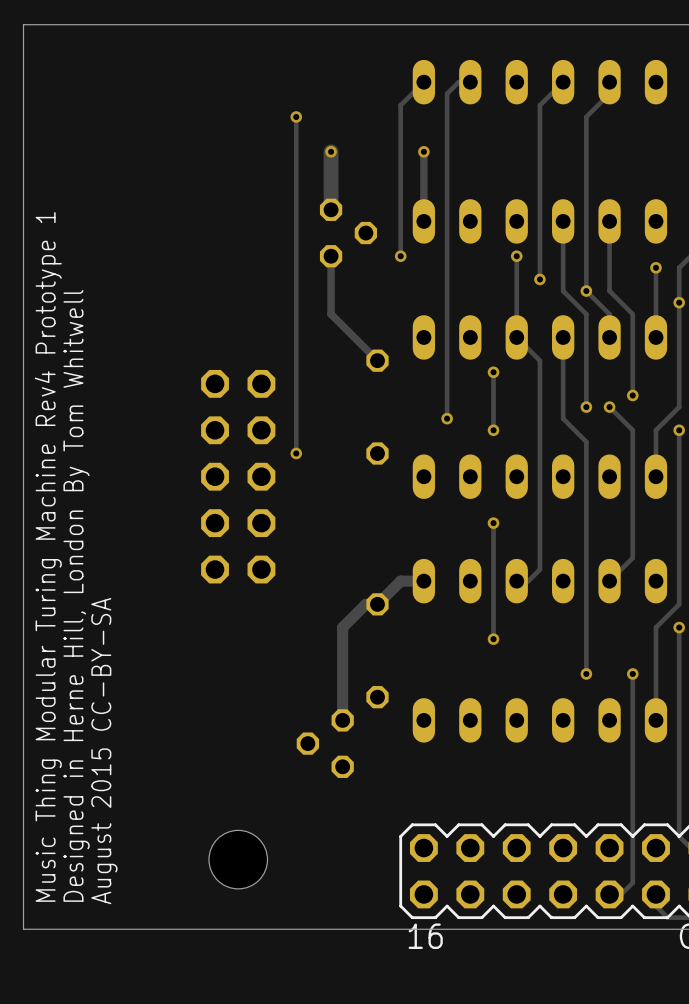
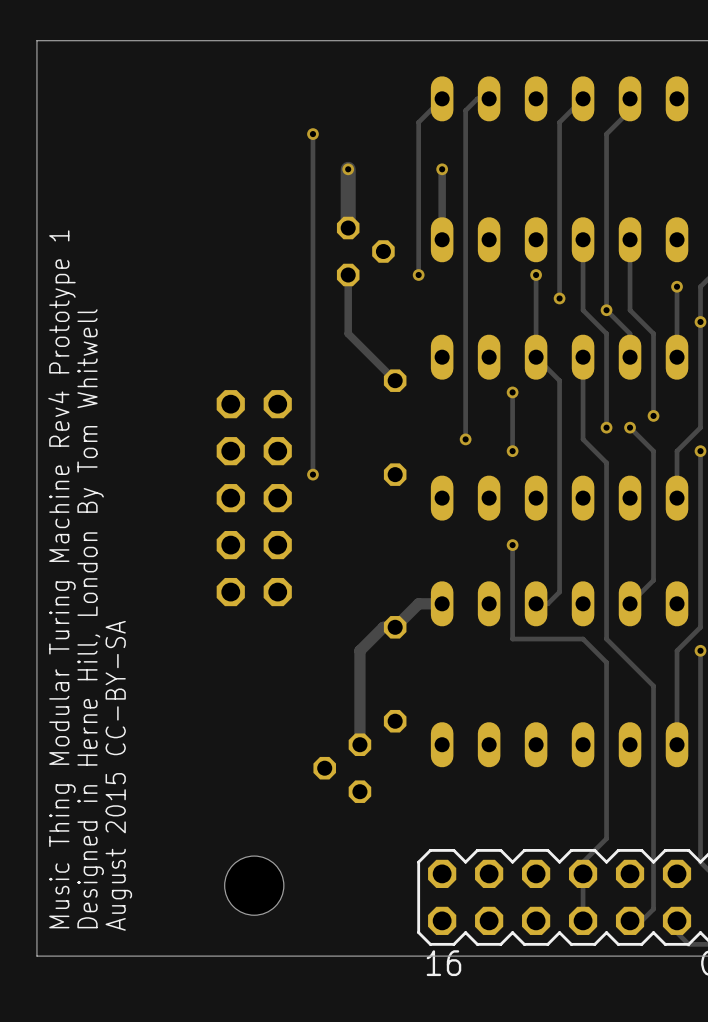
track: (493, 615) (493, 639) -> (512, 639) (583, 639) (606, 662)
track: (586, 615) (586, 639) -> (606, 639) (653, 686) (653, 697)
via: (493, 639) -> none
track: none -> (606, 697) (606, 838) (583, 862) (583, 920)
via: (586, 673) -> none
via: (632, 673) -> none

